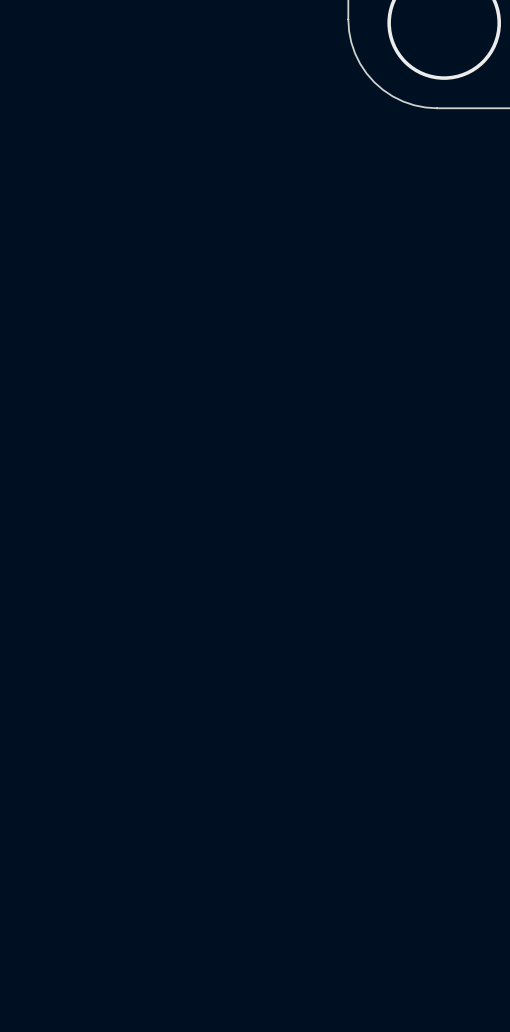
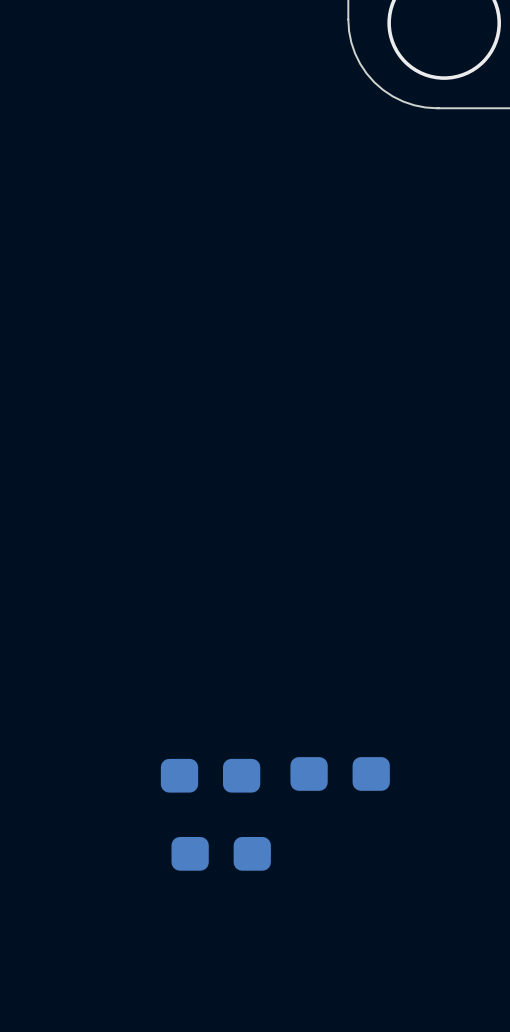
part: none -> (340, 773)
part: none -> (210, 775)
part: none -> (221, 853)

